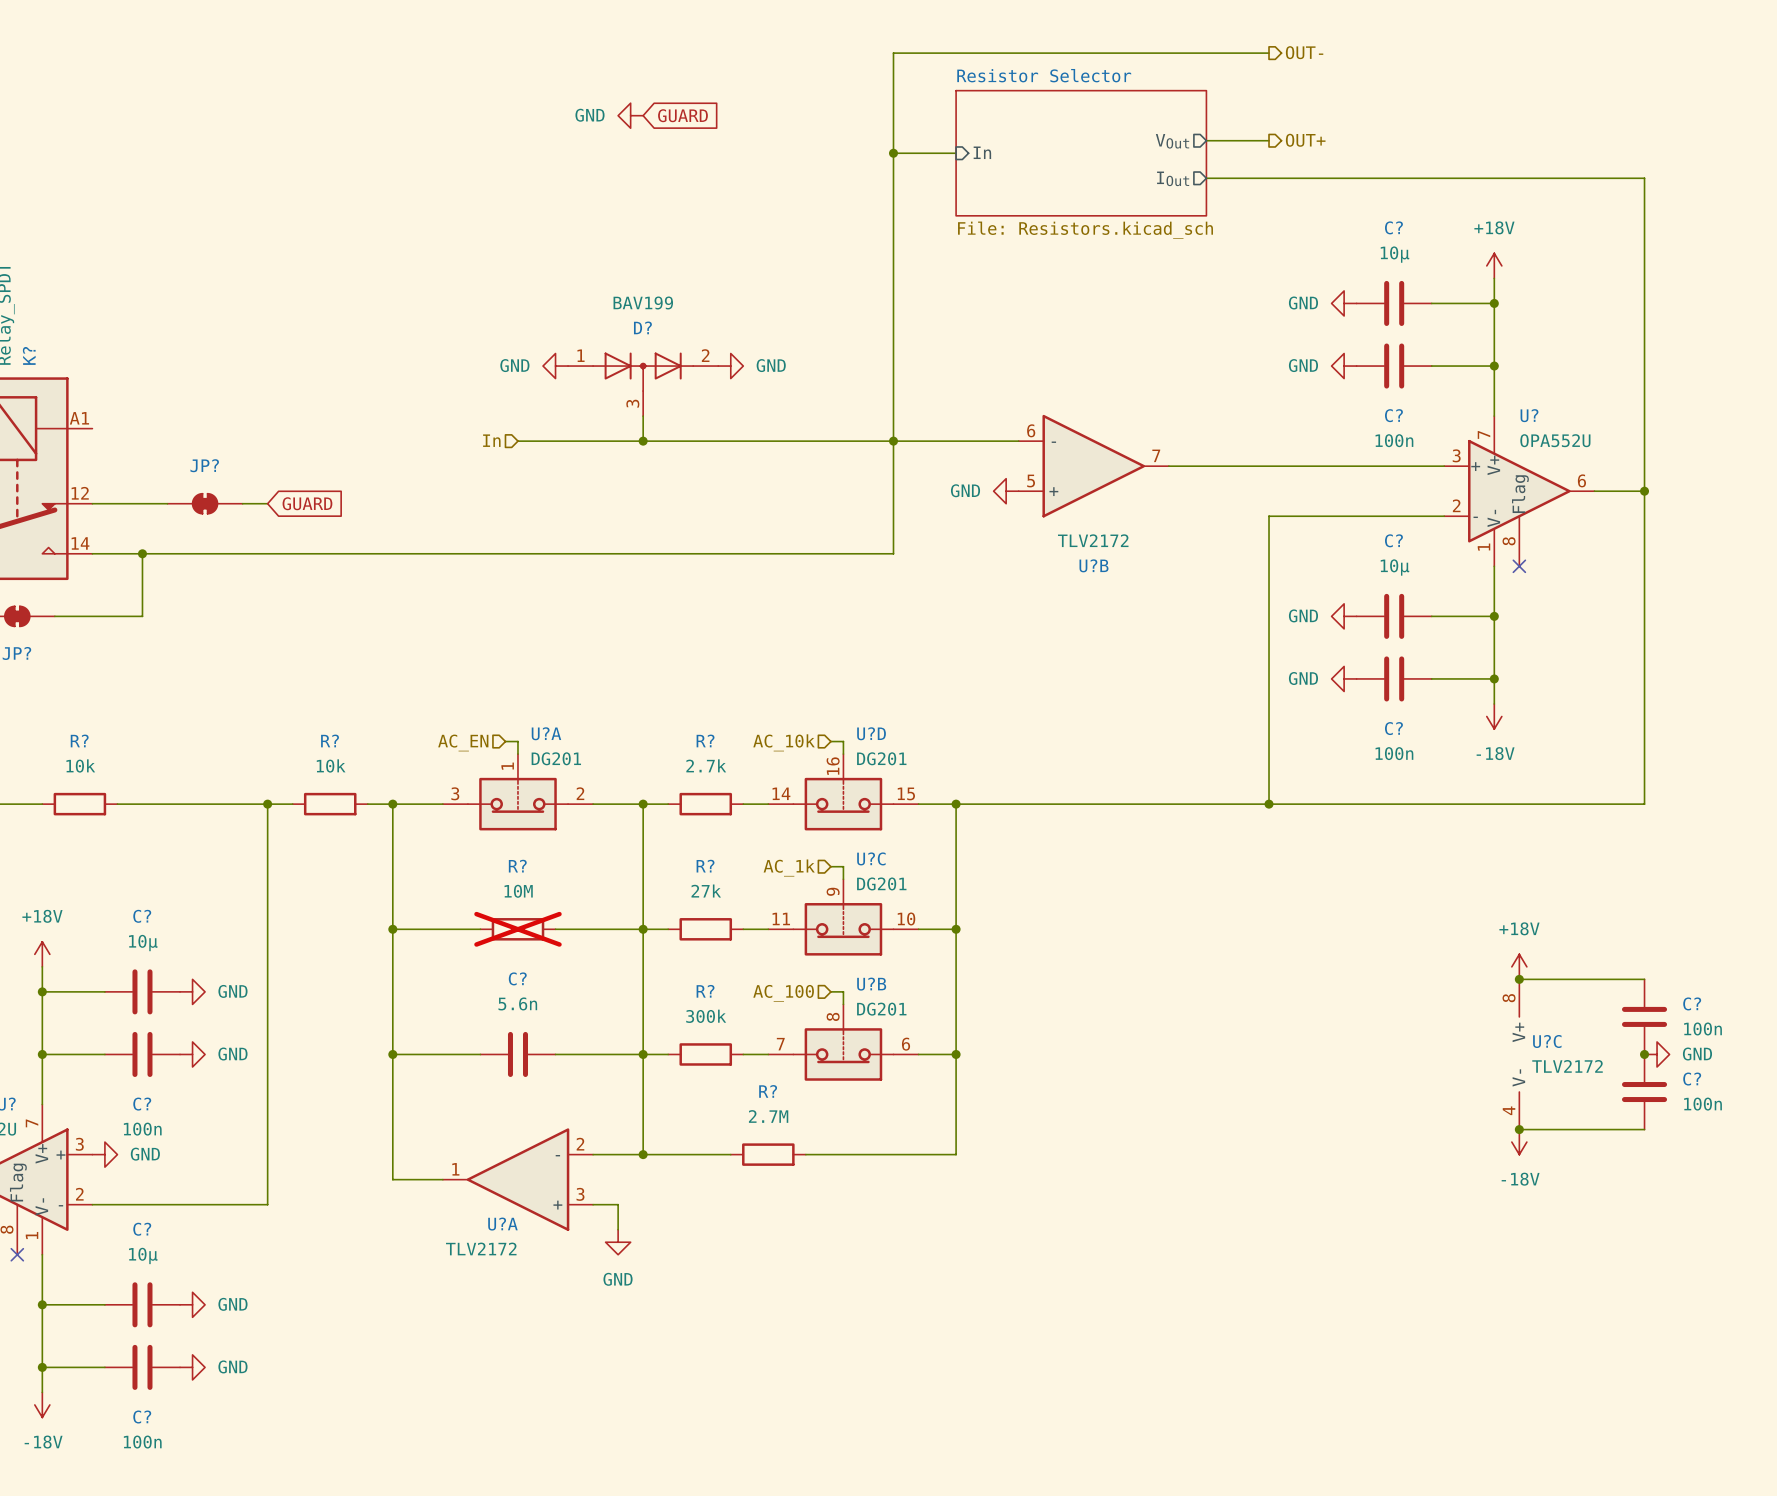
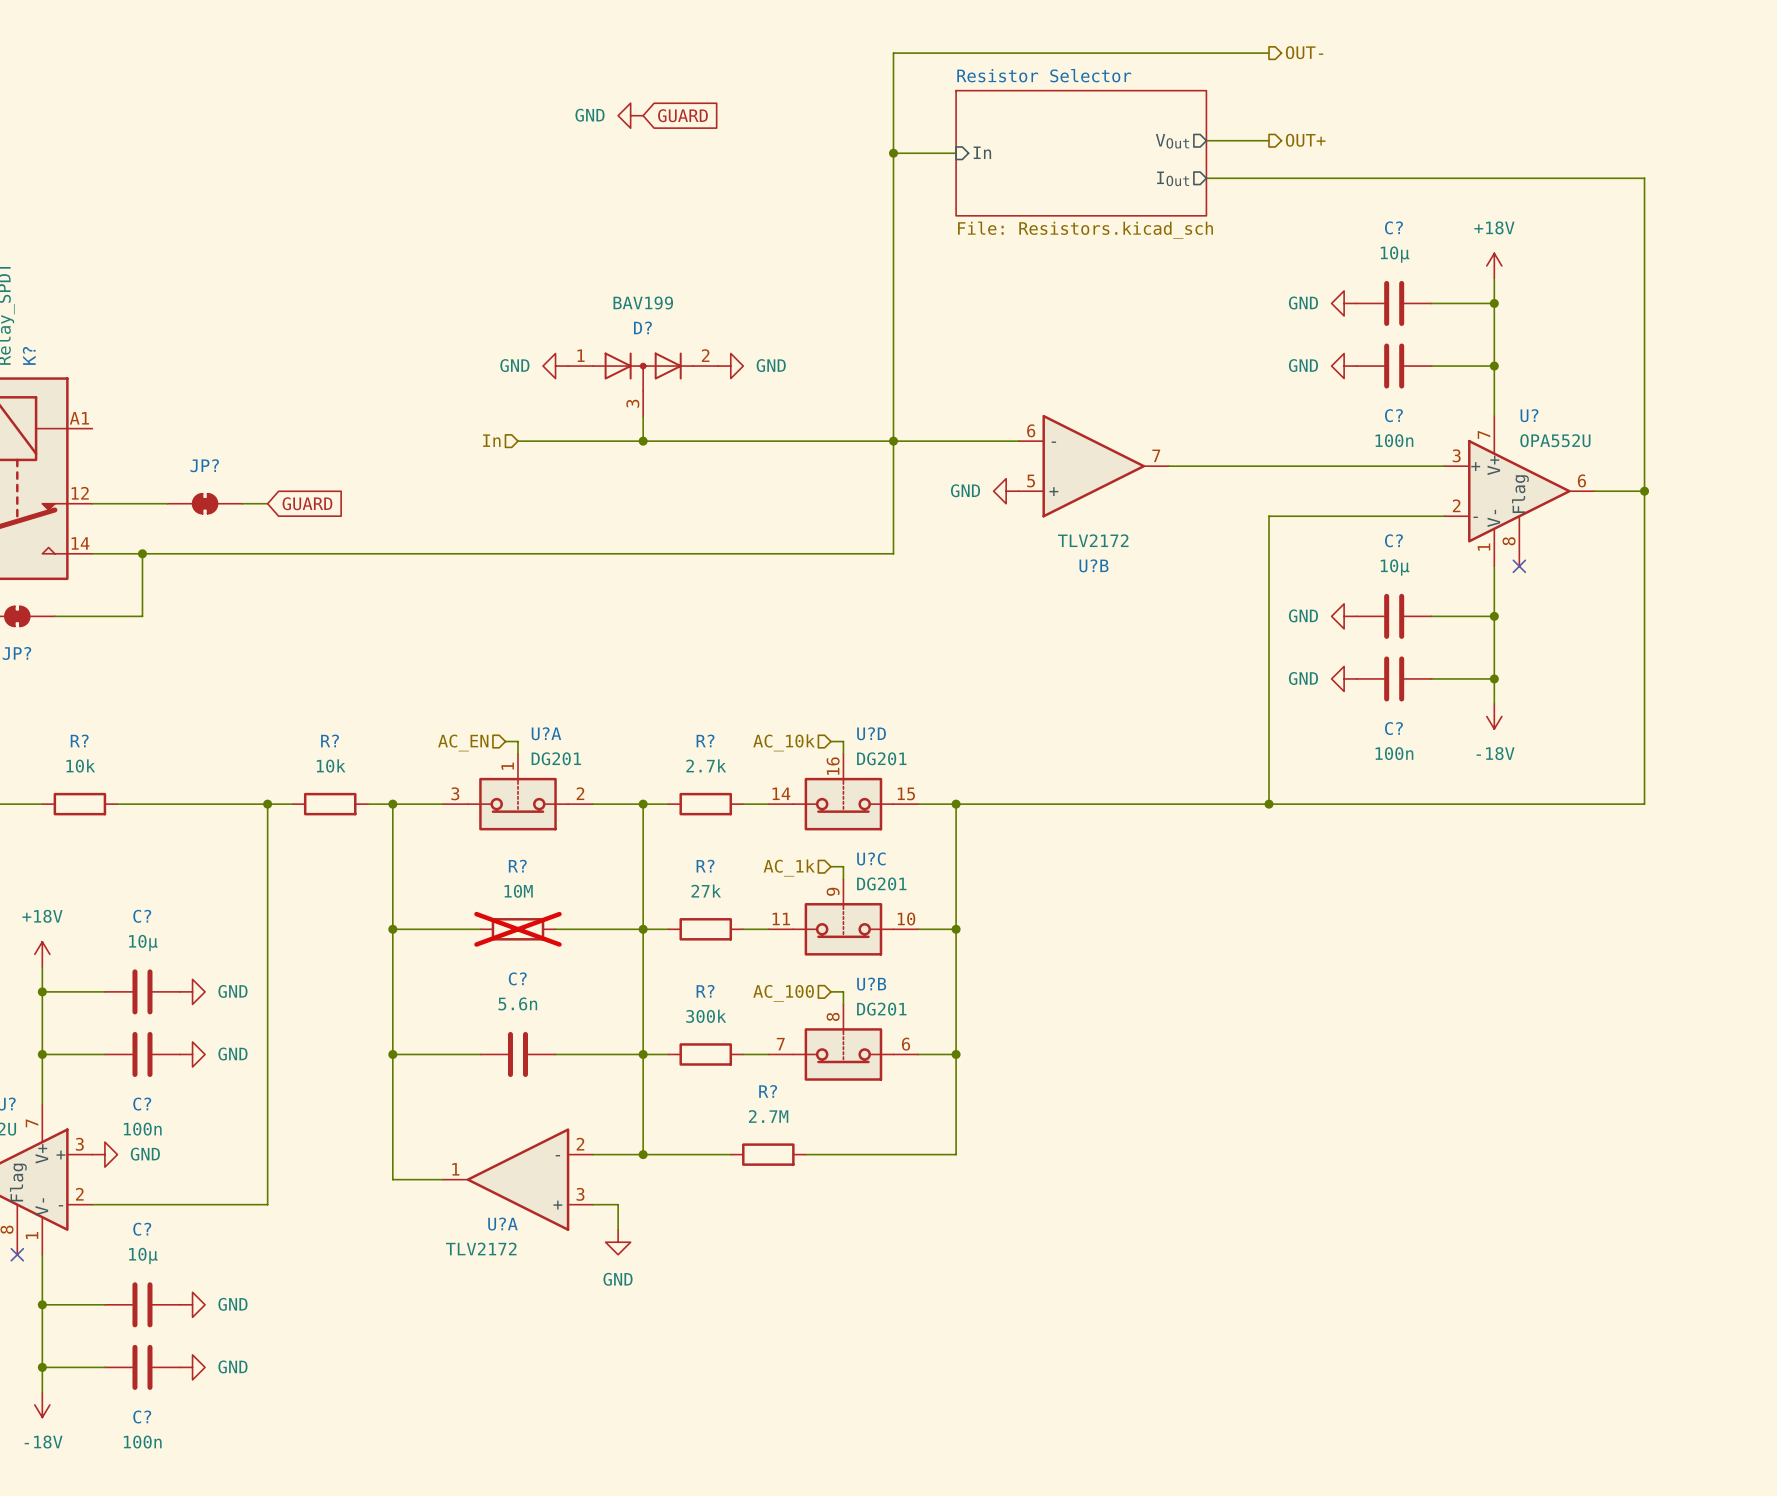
power symbol: +18V (1519, 966) -> none
wire: (1519, 979) (1644, 979) -> none
junction: (1519, 979) -> none
C?: 100n (1644, 1016) -> none
U?C: TLV2172 (1519, 1054) -> none
junction: (1644, 1054) -> none
power symbol: GND (1657, 1054) -> none
C?: 100n (1644, 1092) -> none
wire: (1519, 1129) (1644, 1129) -> none
junction: (1519, 1129) -> none
power symbol: -18V (1519, 1142) -> none

